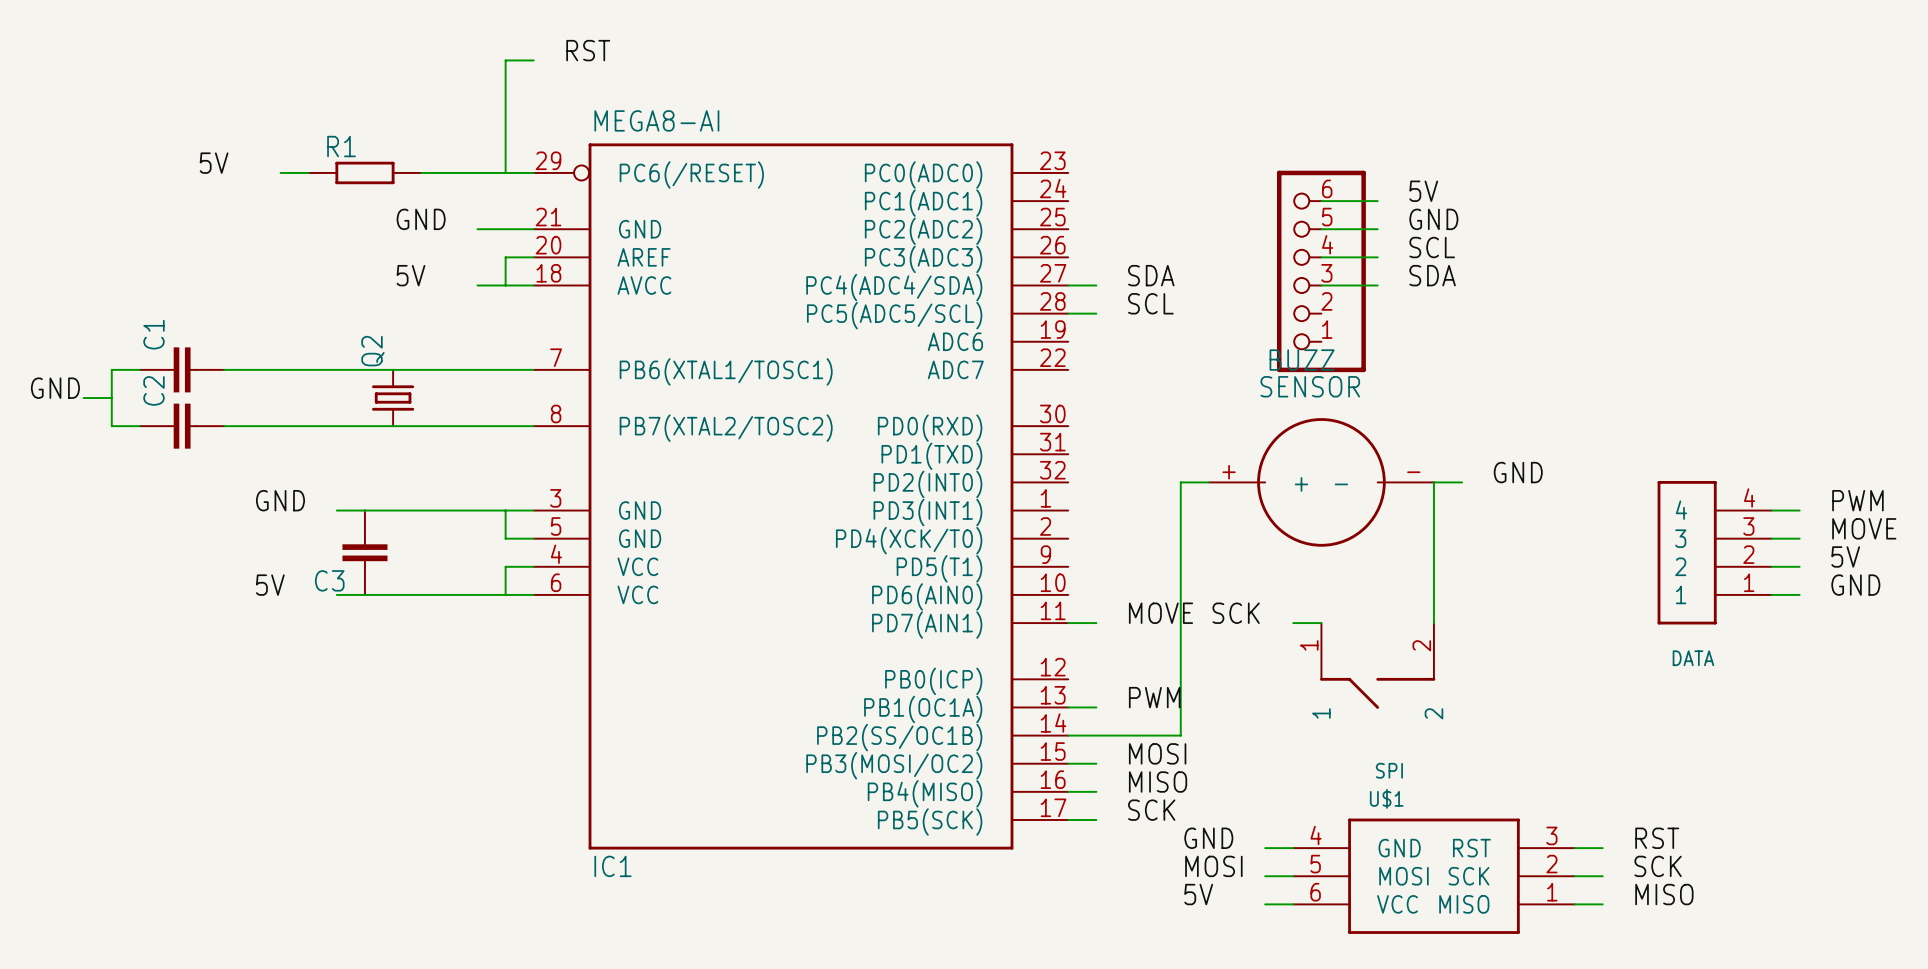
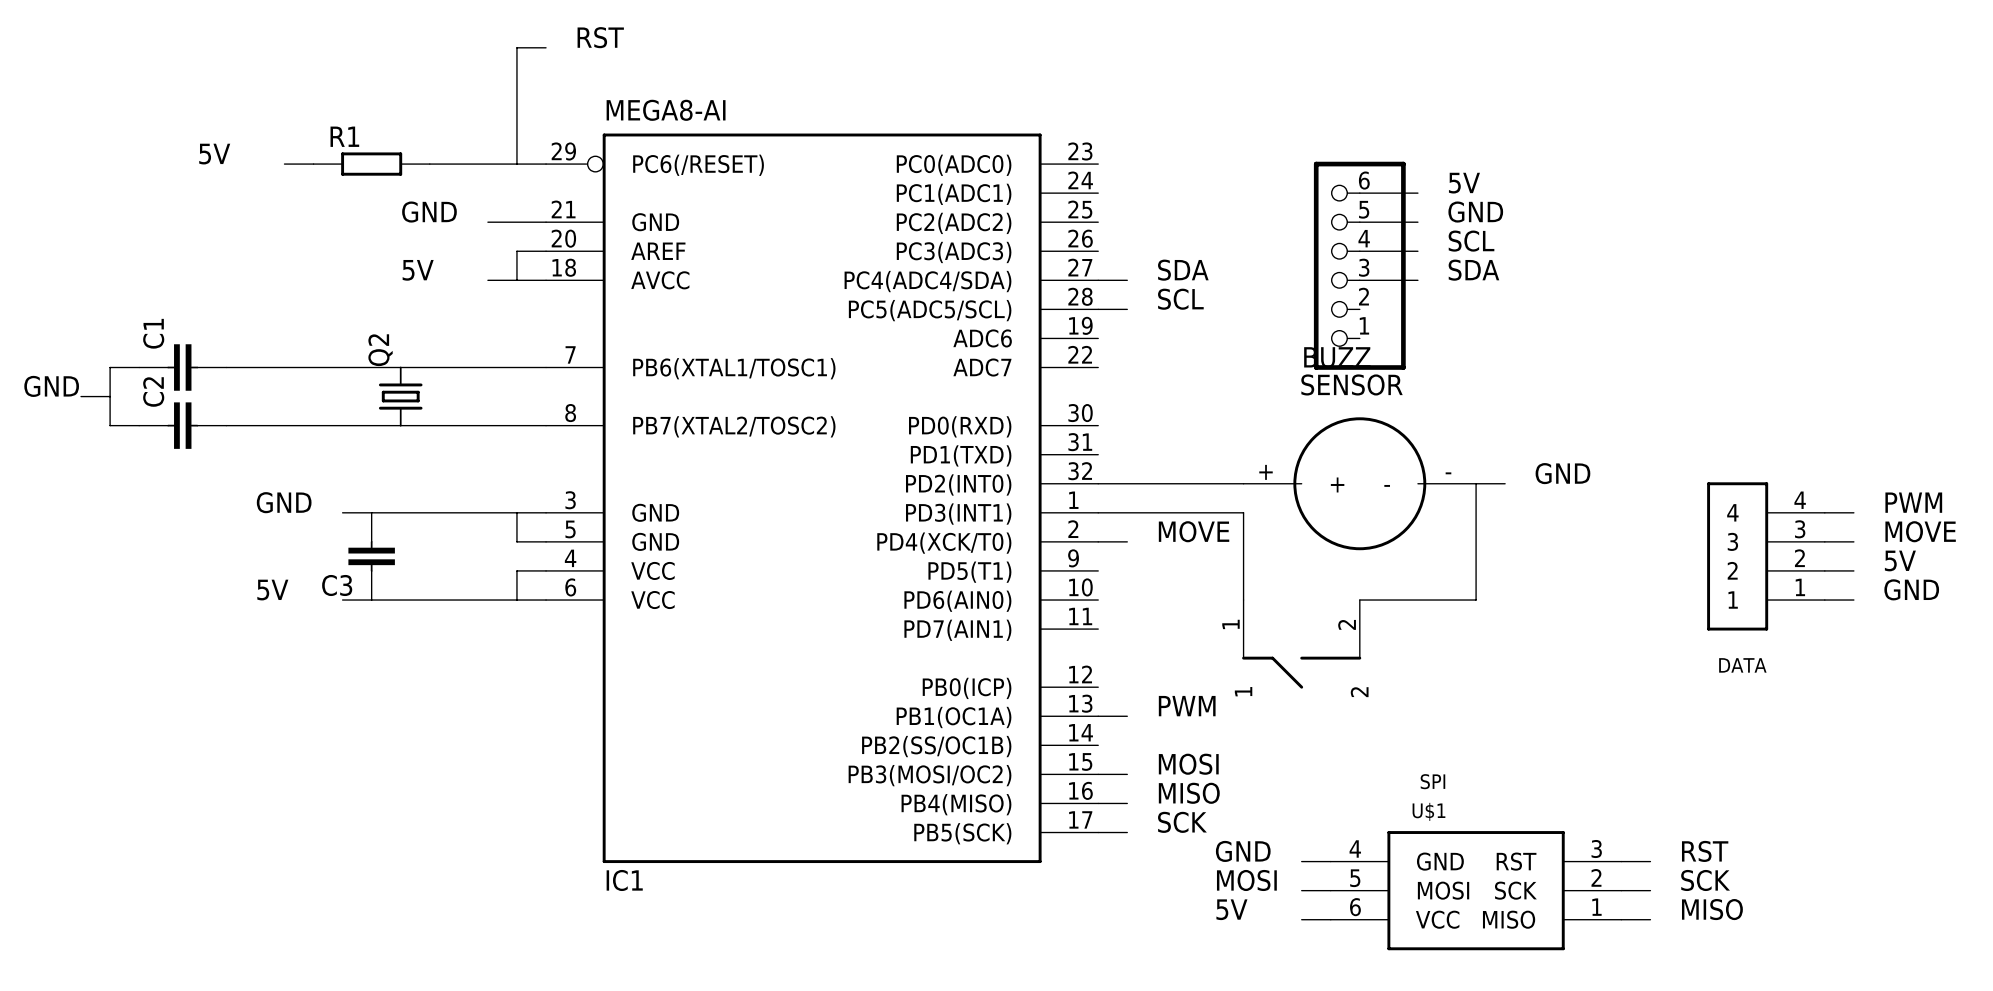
wire: (1180, 482) (1180, 735) (1068, 735) -> (1214, 483) (1098, 483)
wire: none -> (1098, 512) (1243, 512) (1243, 600)
wire: (1433, 594) (1433, 623) -> (1476, 600) (1359, 600)
label position: MOVE (1160, 613) -> MOVE (1194, 531)
label: SCK (1236, 613) -> none
wire: (1068, 623) (1096, 623) -> (1098, 541) (1127, 541)
wire: (1293, 623) (1321, 623) -> none
part position: (1377, 665) -> (1301, 644)

